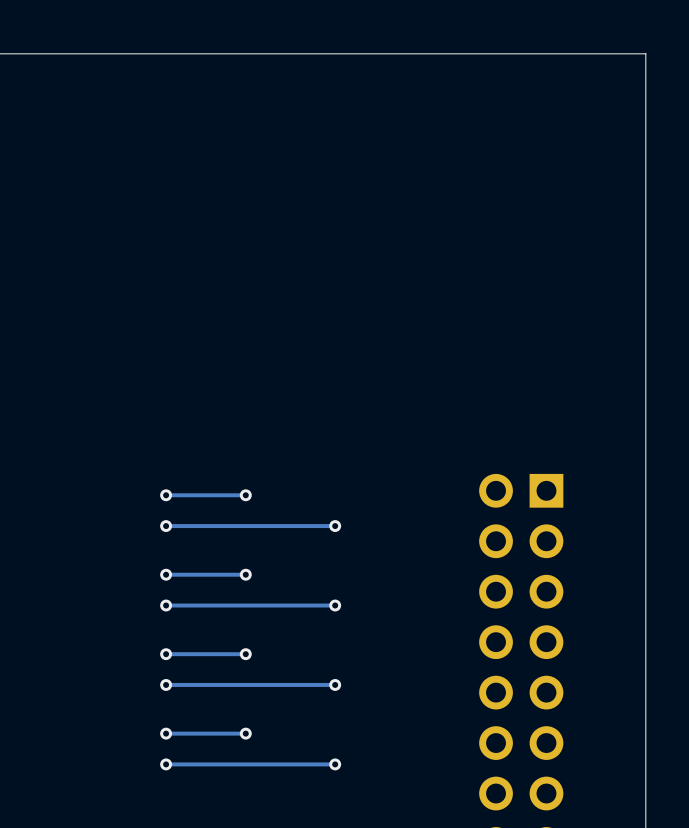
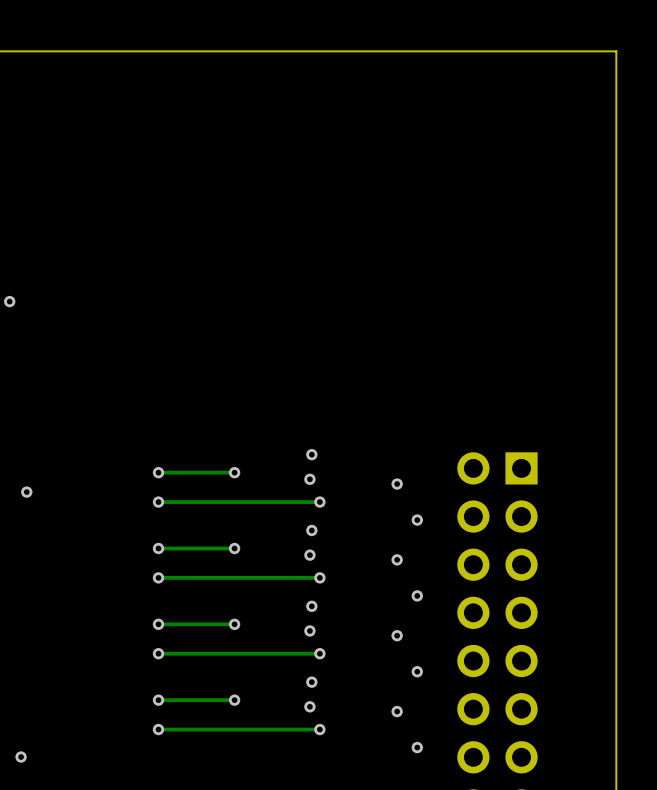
via: none -> (9, 301)
via: none -> (311, 454)
via: none -> (309, 479)
via: none -> (397, 484)
via: none -> (26, 492)
via: none -> (417, 520)
via: none -> (311, 530)
via: none -> (309, 555)
via: none -> (397, 559)
via: none -> (417, 595)
via: none -> (311, 606)
via: none -> (309, 630)
via: none -> (397, 635)
via: none -> (417, 671)
via: none -> (311, 682)
via: none -> (309, 706)
via: none -> (397, 711)
via: none -> (417, 747)
via: none -> (21, 757)

